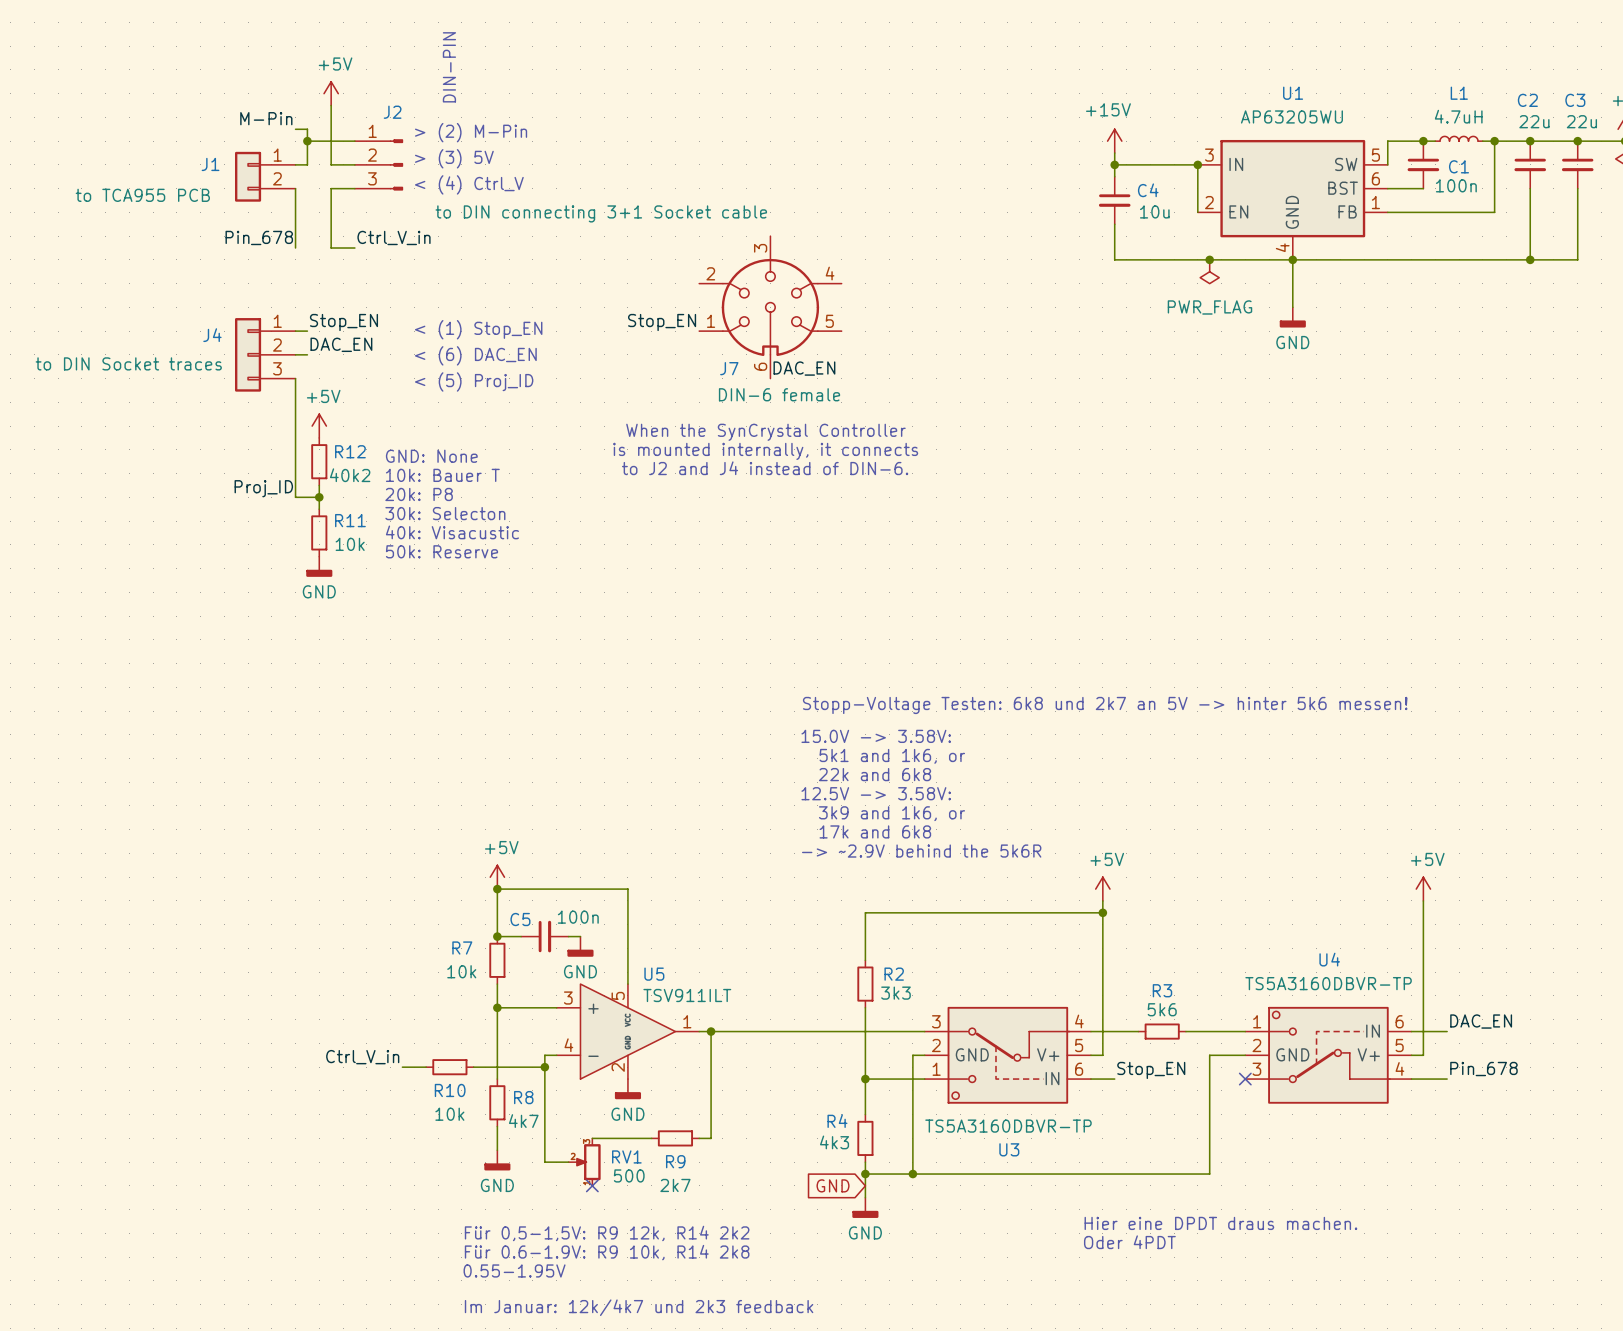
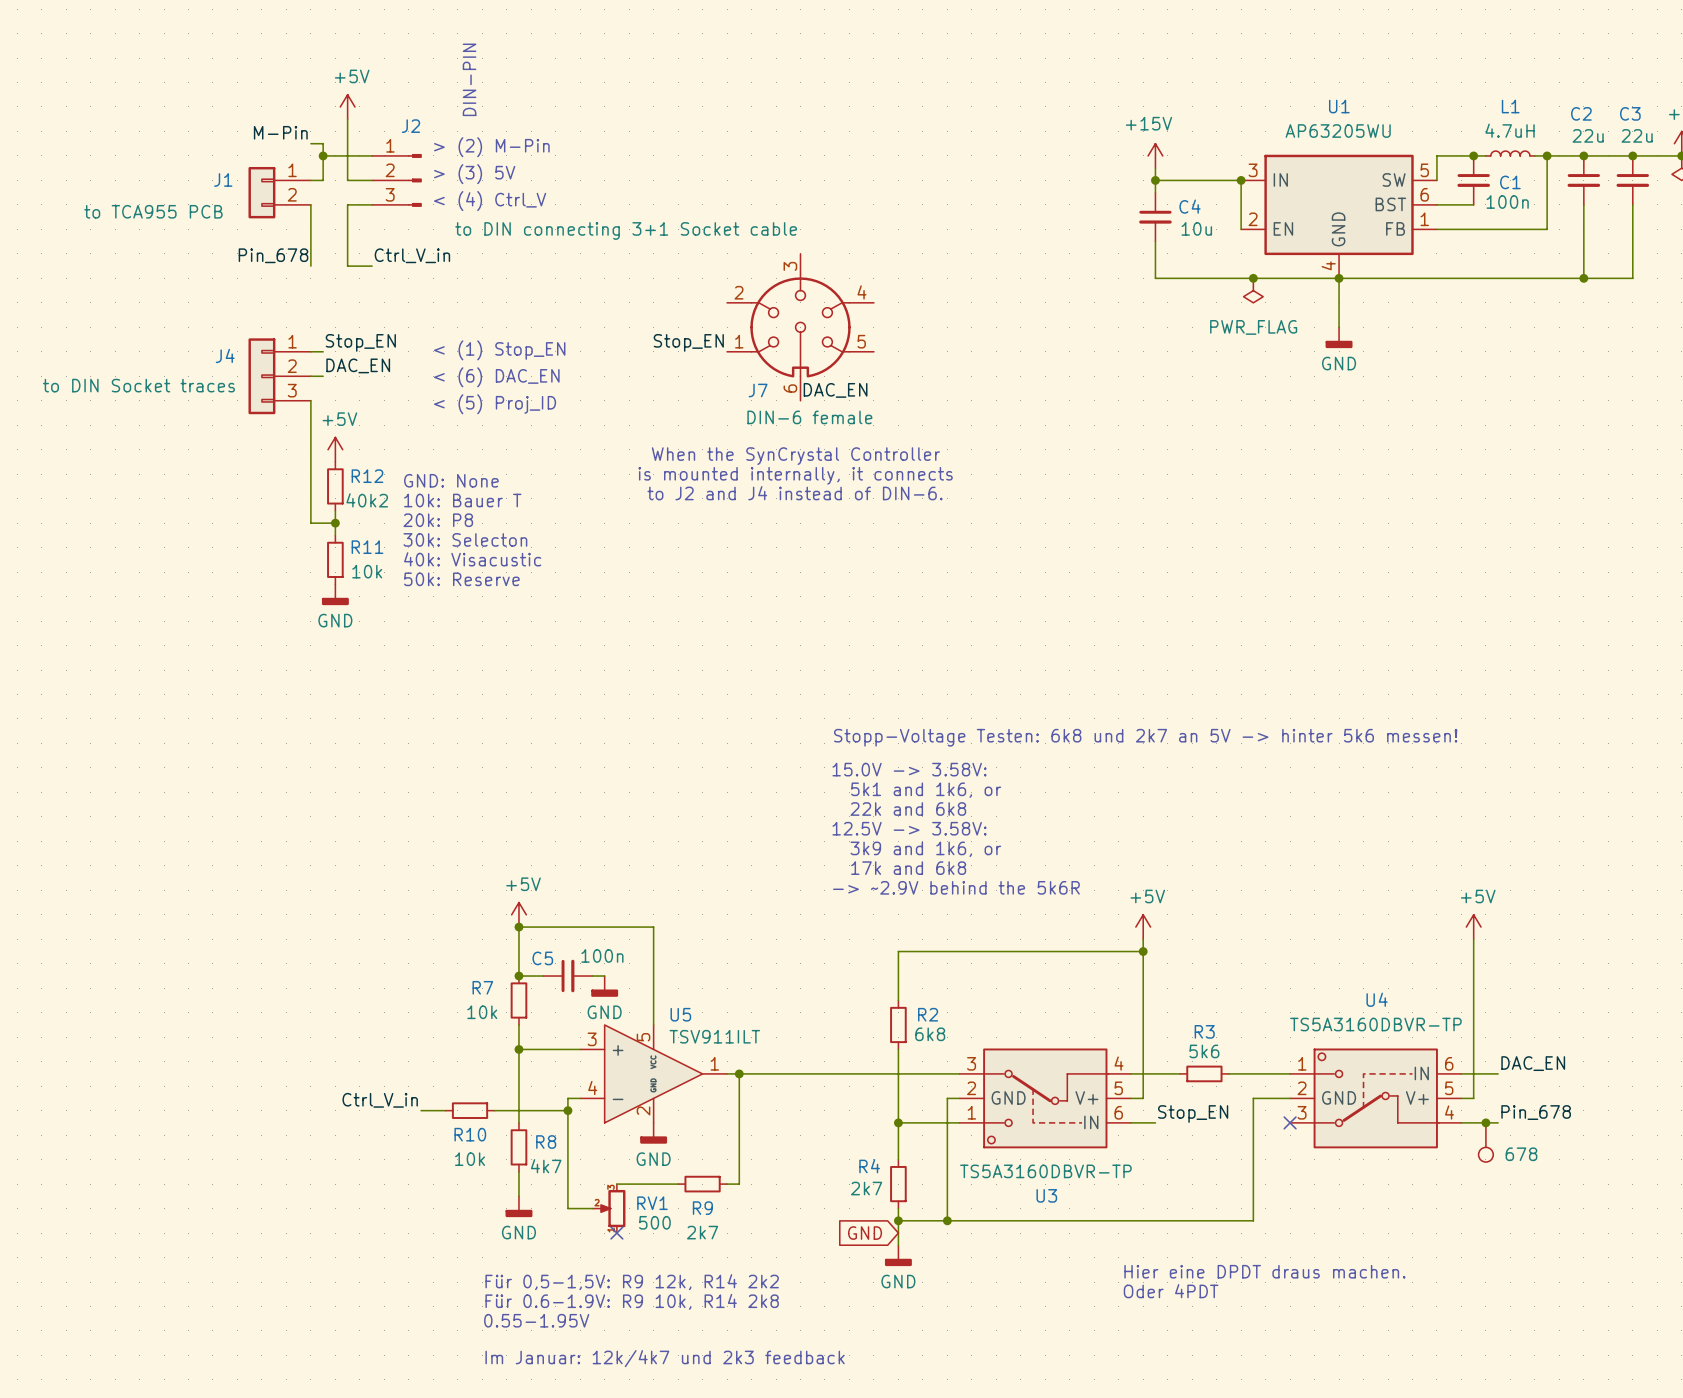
label: Proj_ID (263, 488) -> none
R2 value: 3k3 (895, 993) -> 6k8 (930, 1034)
junction: none -> (1485, 1122)
part: none -> 678 (1485, 1142)
R4 value: 4k3 (834, 1142) -> 2k7 (866, 1188)

